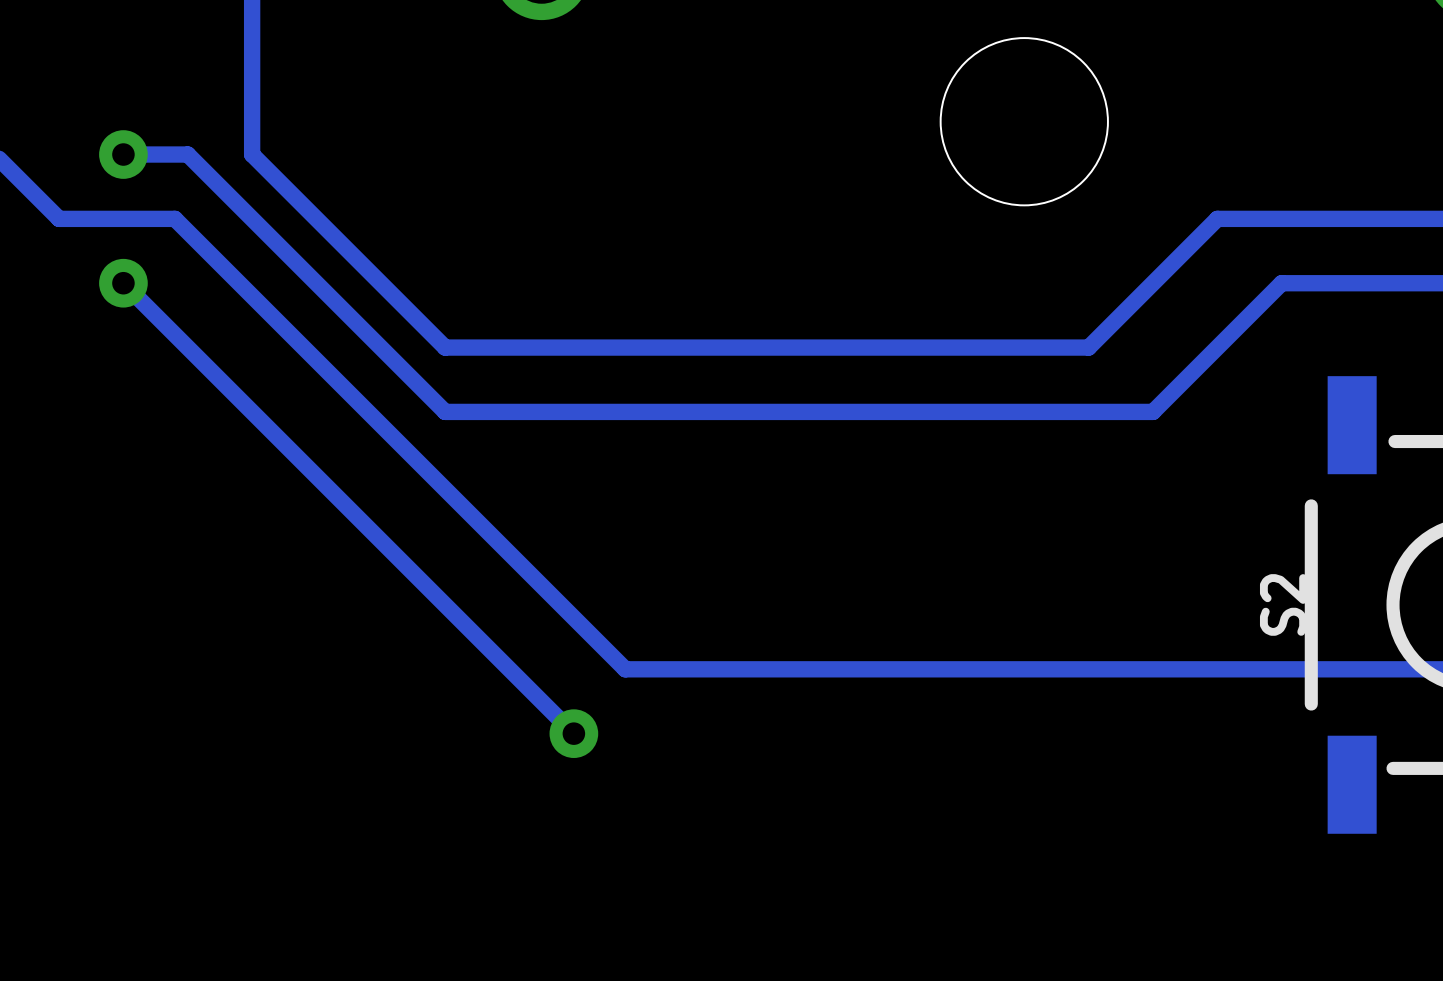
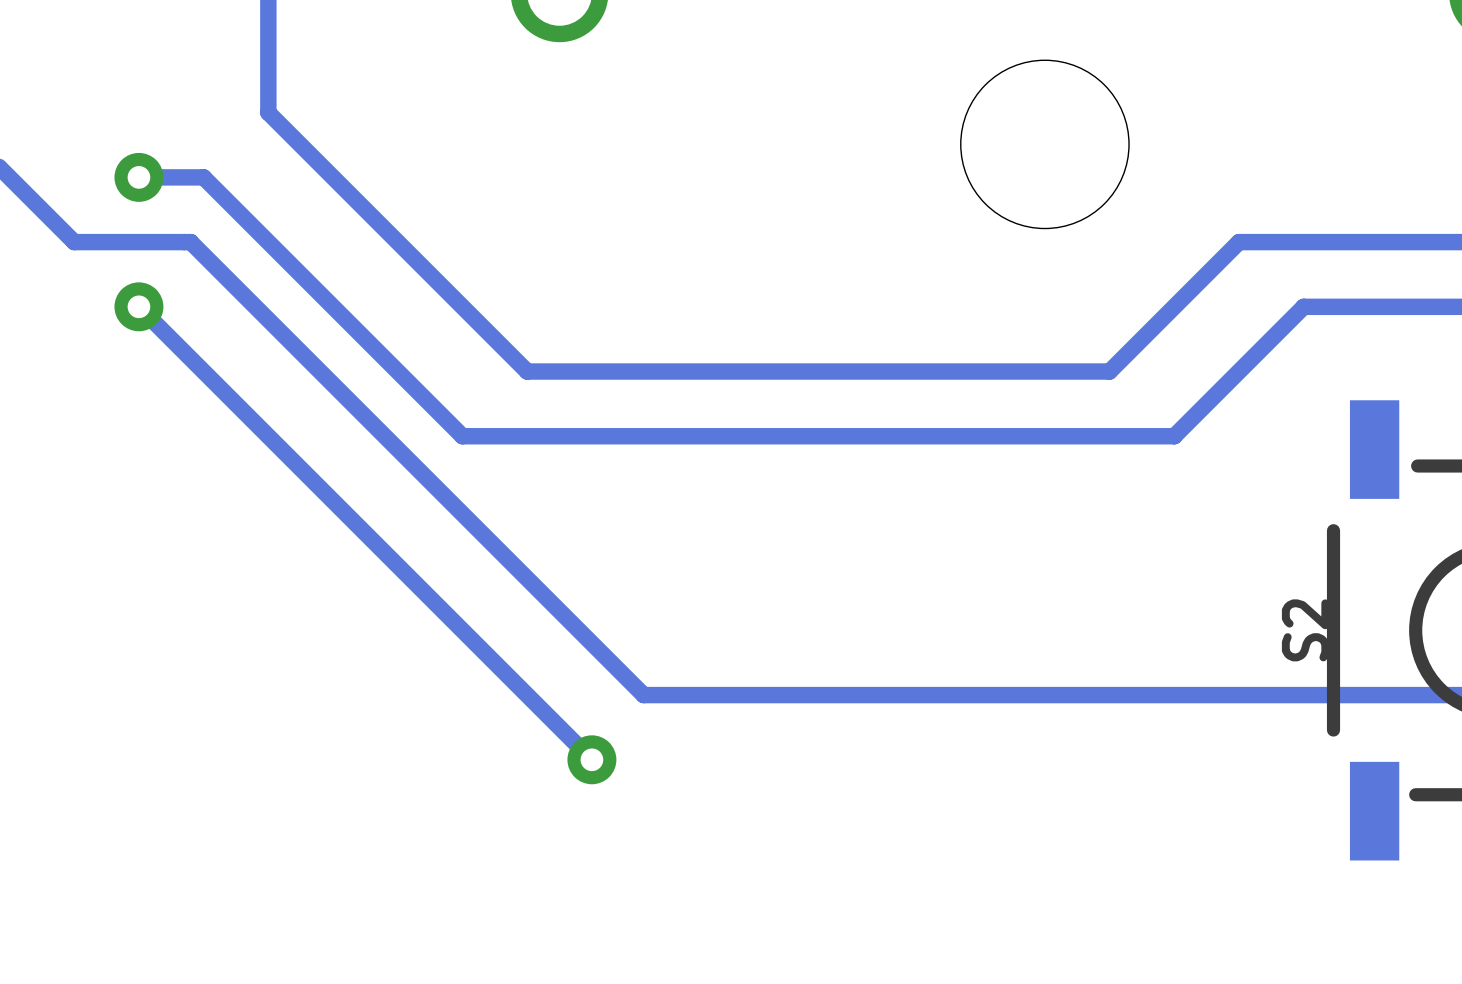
track: (252, 90) (252, 154) (445, 347) (509, 347) -> (268, 112) (527, 371)

